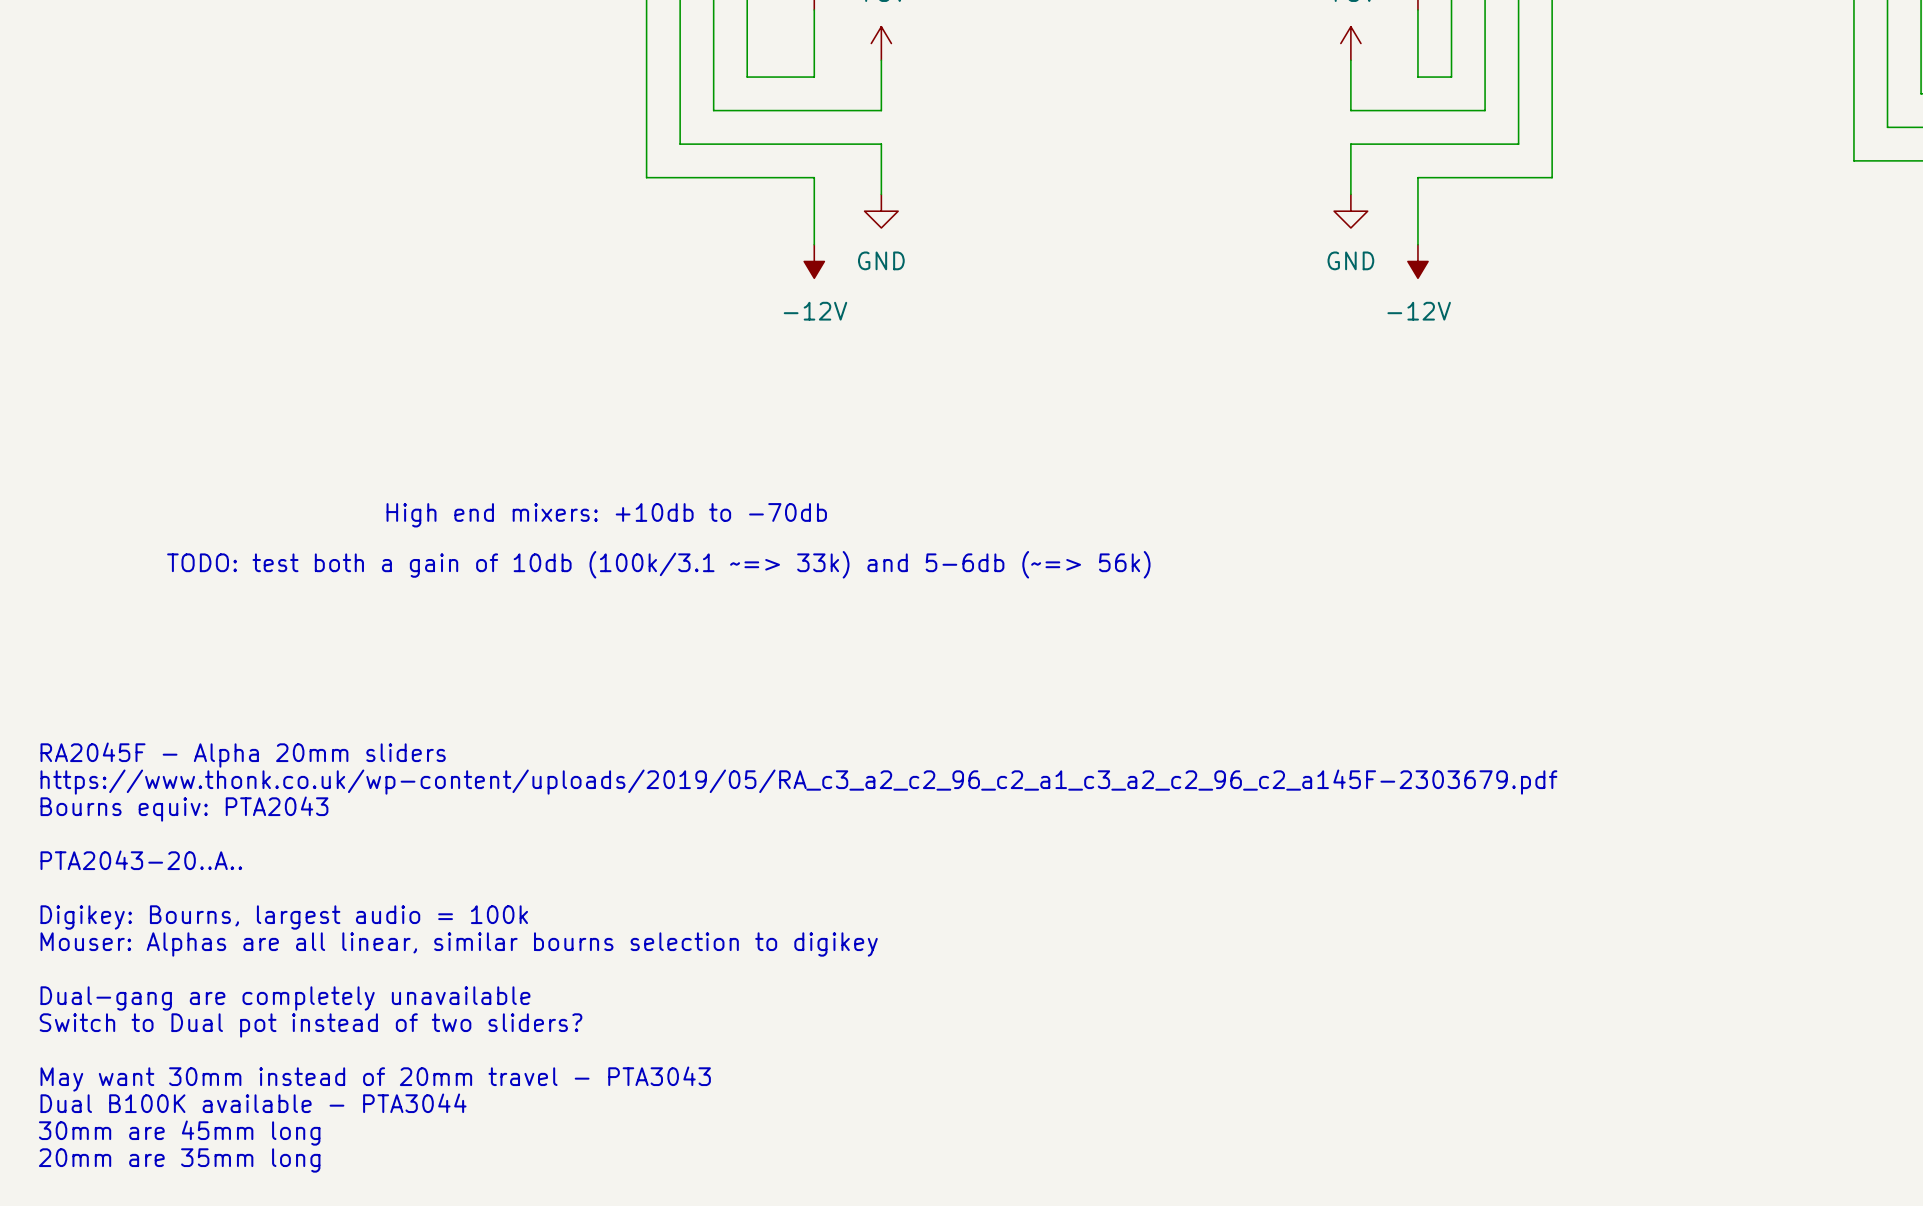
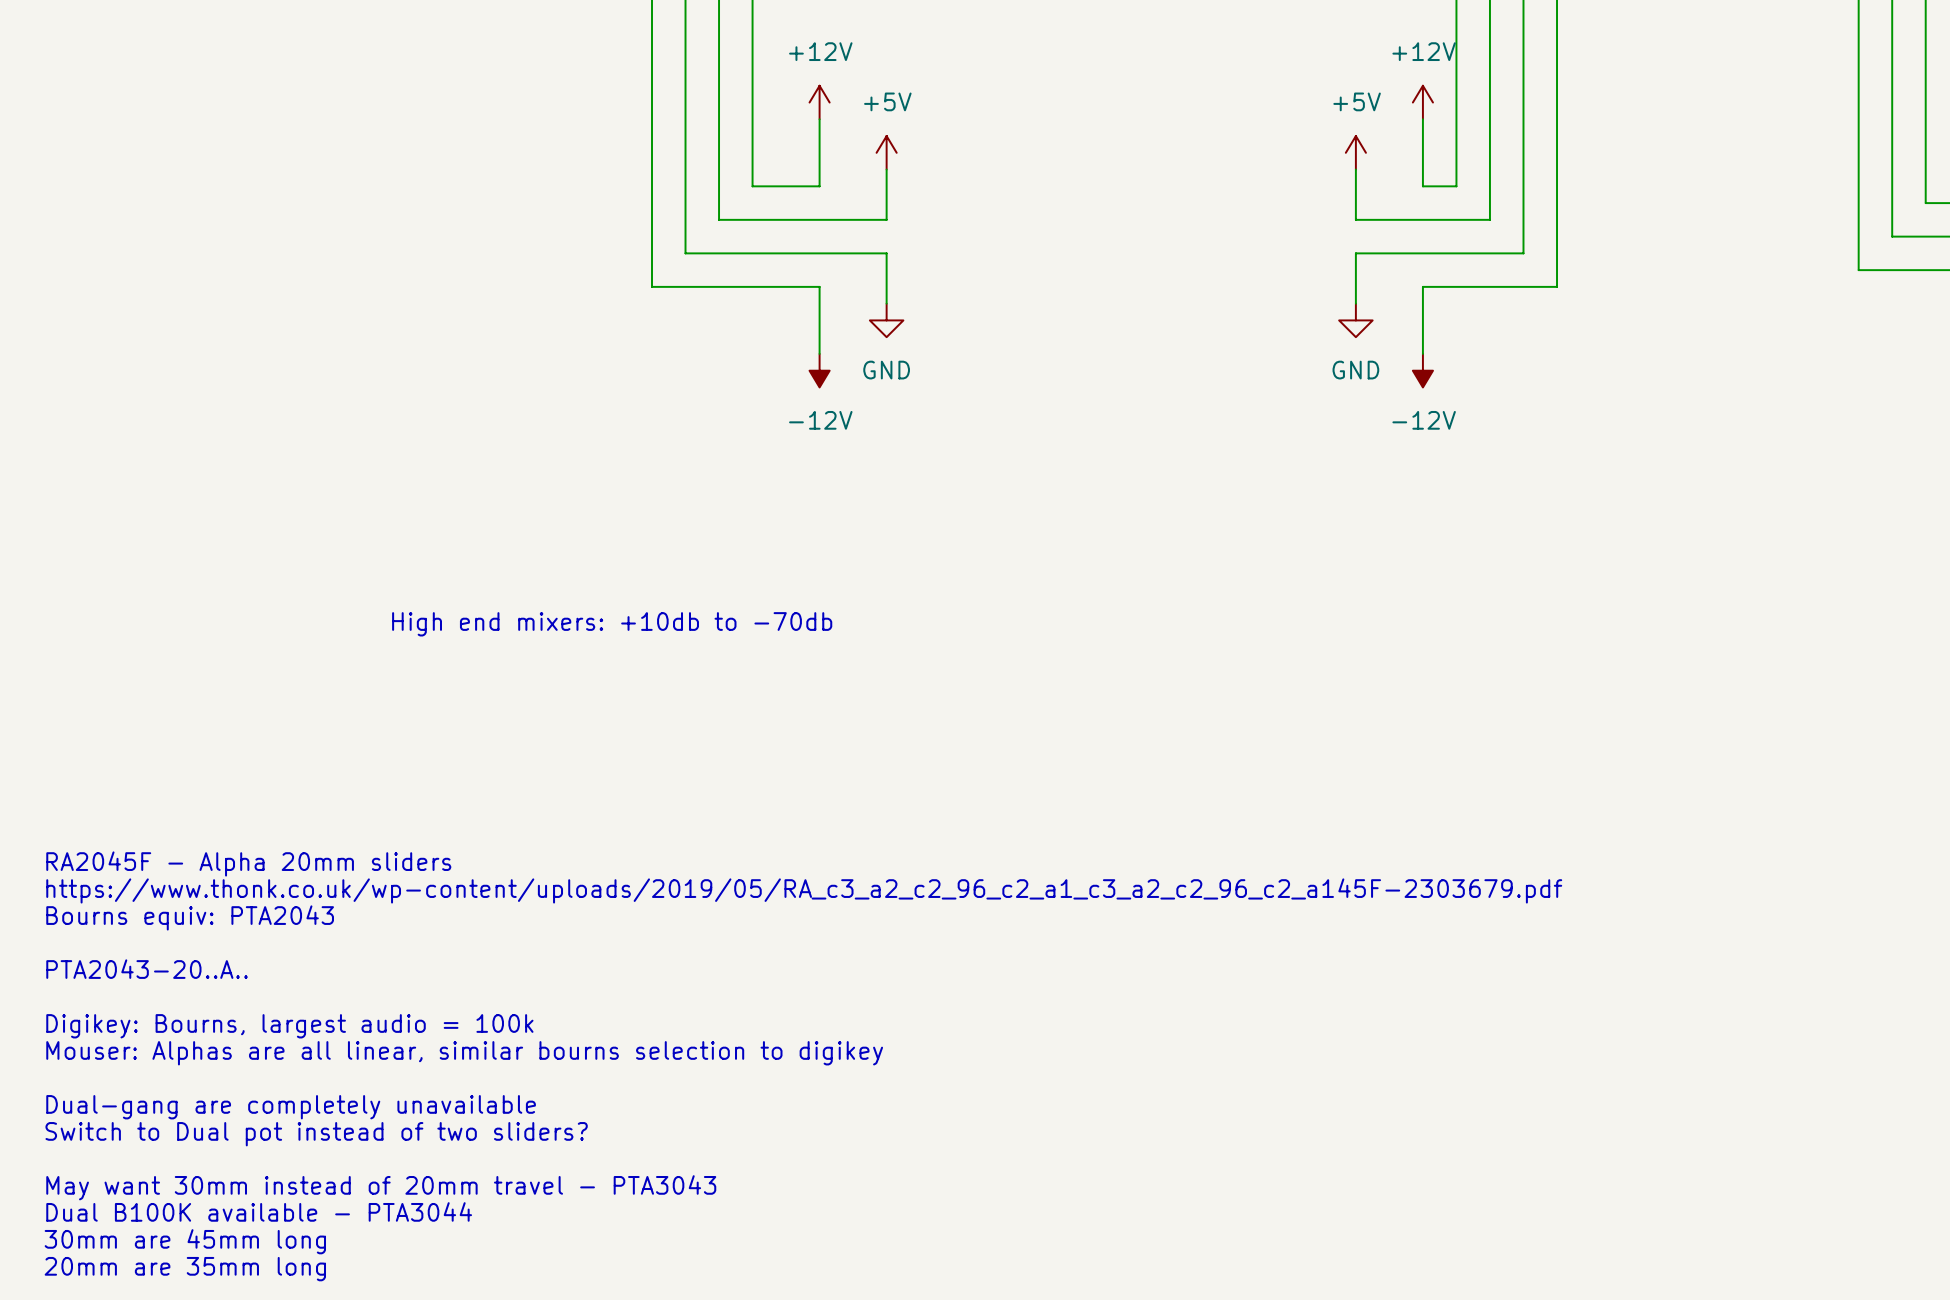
text: TODO: test both a gain of 10db (100k/3.1 ~=> 33k) and 5-6db (~=> 56k) (658, 564) -> none

